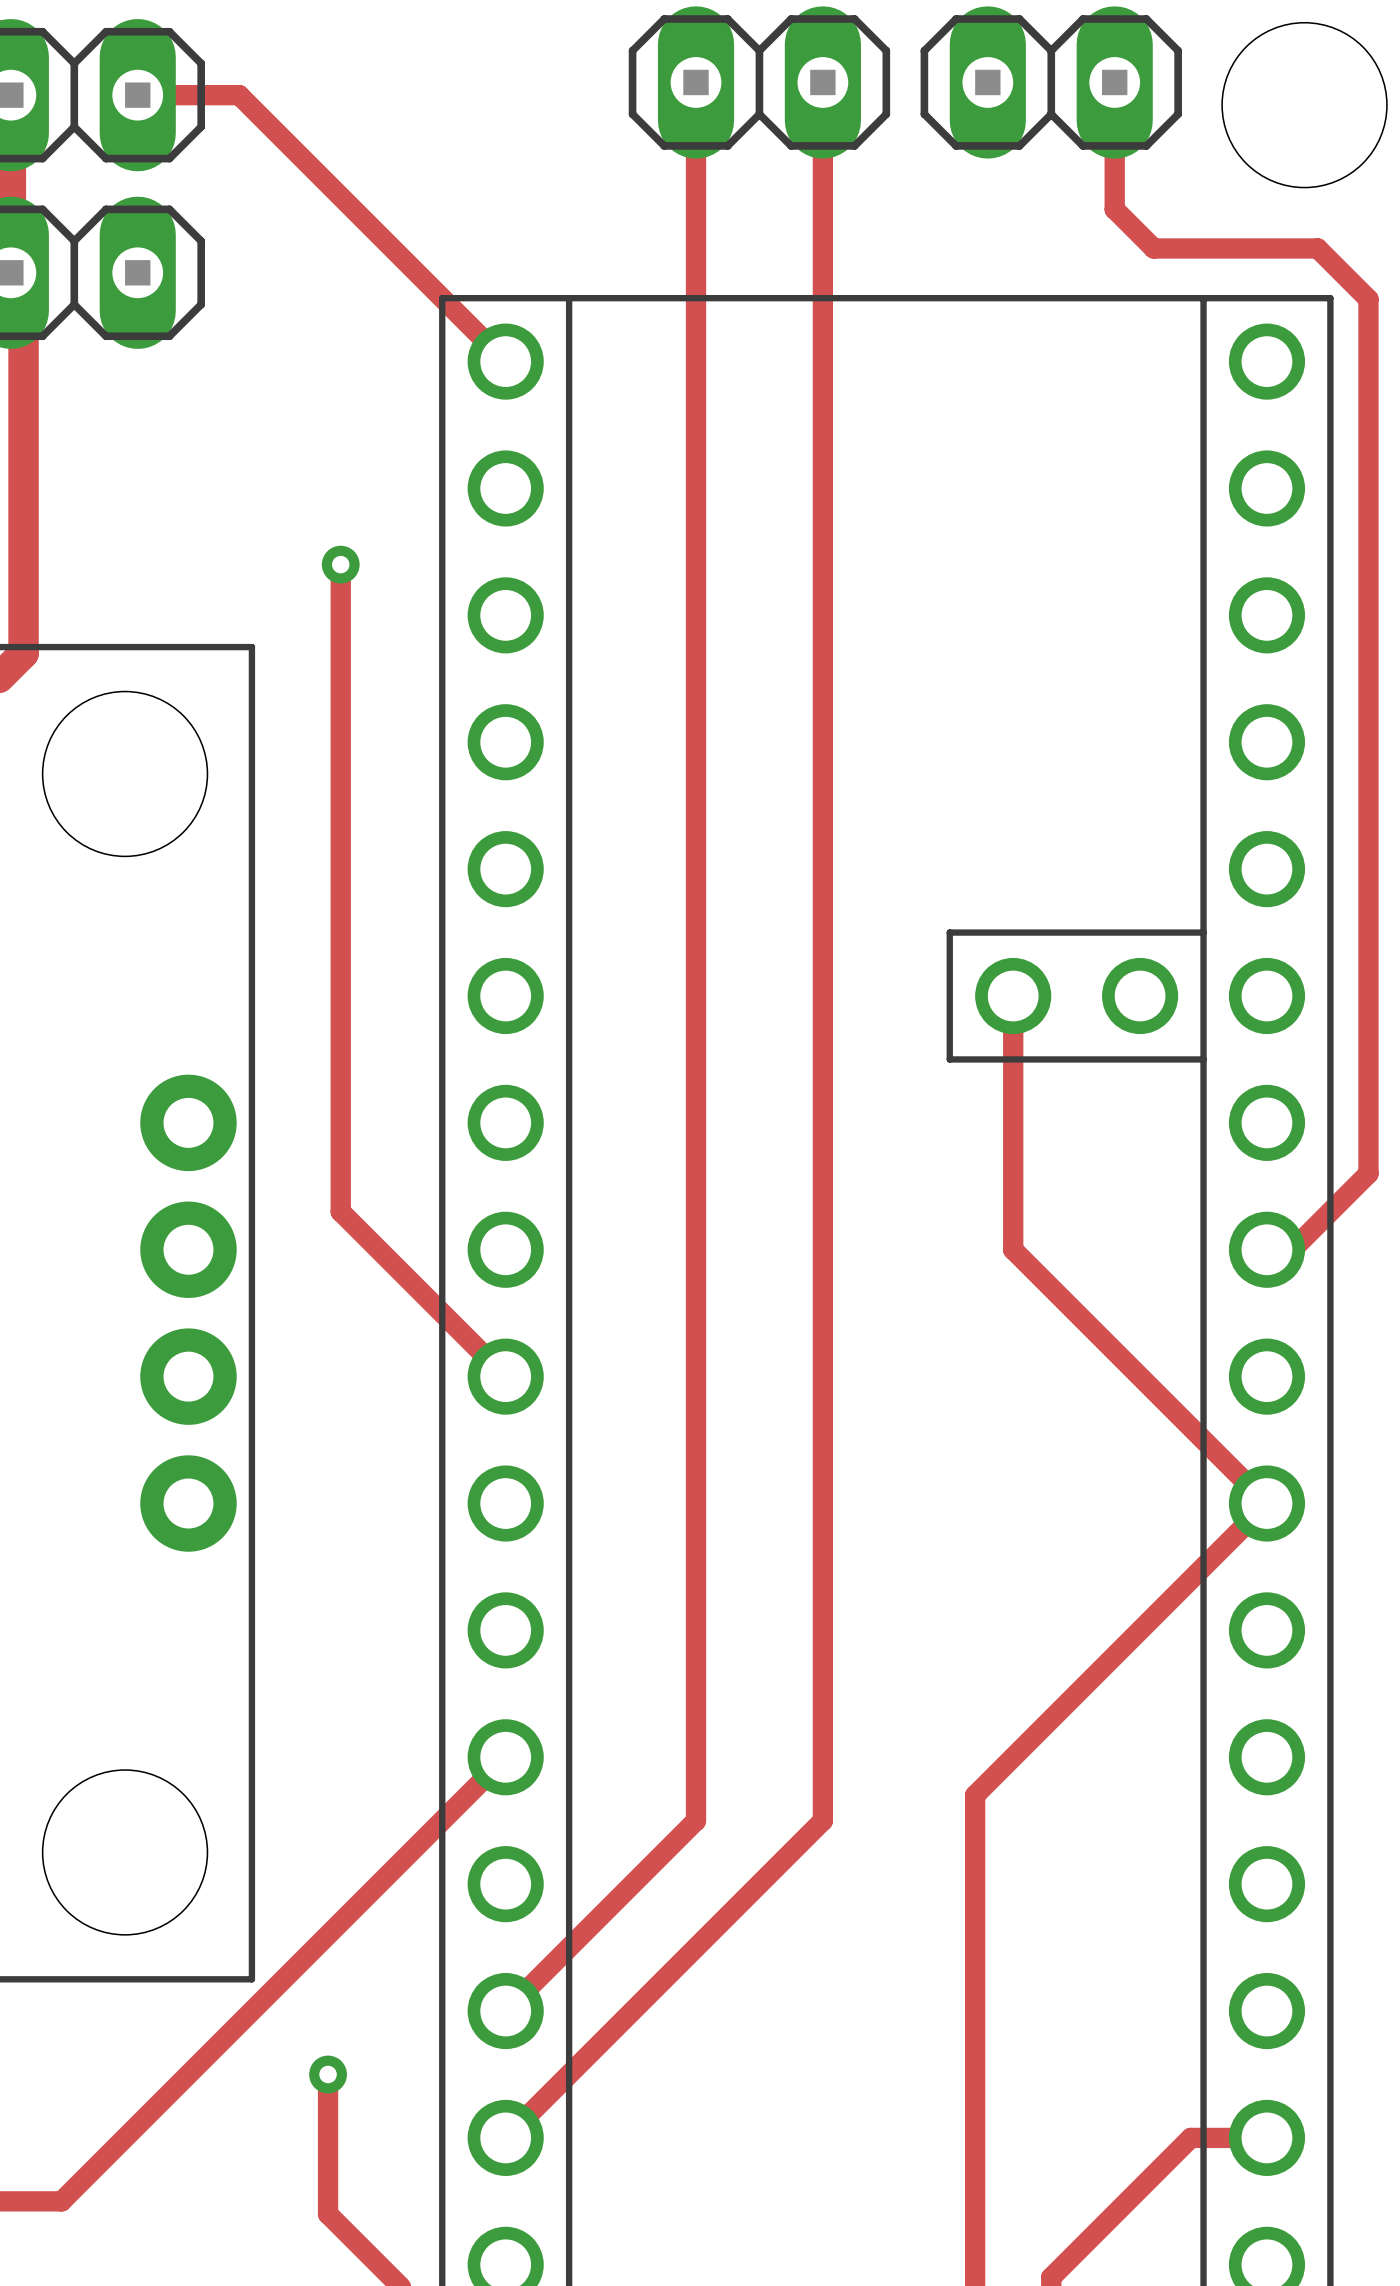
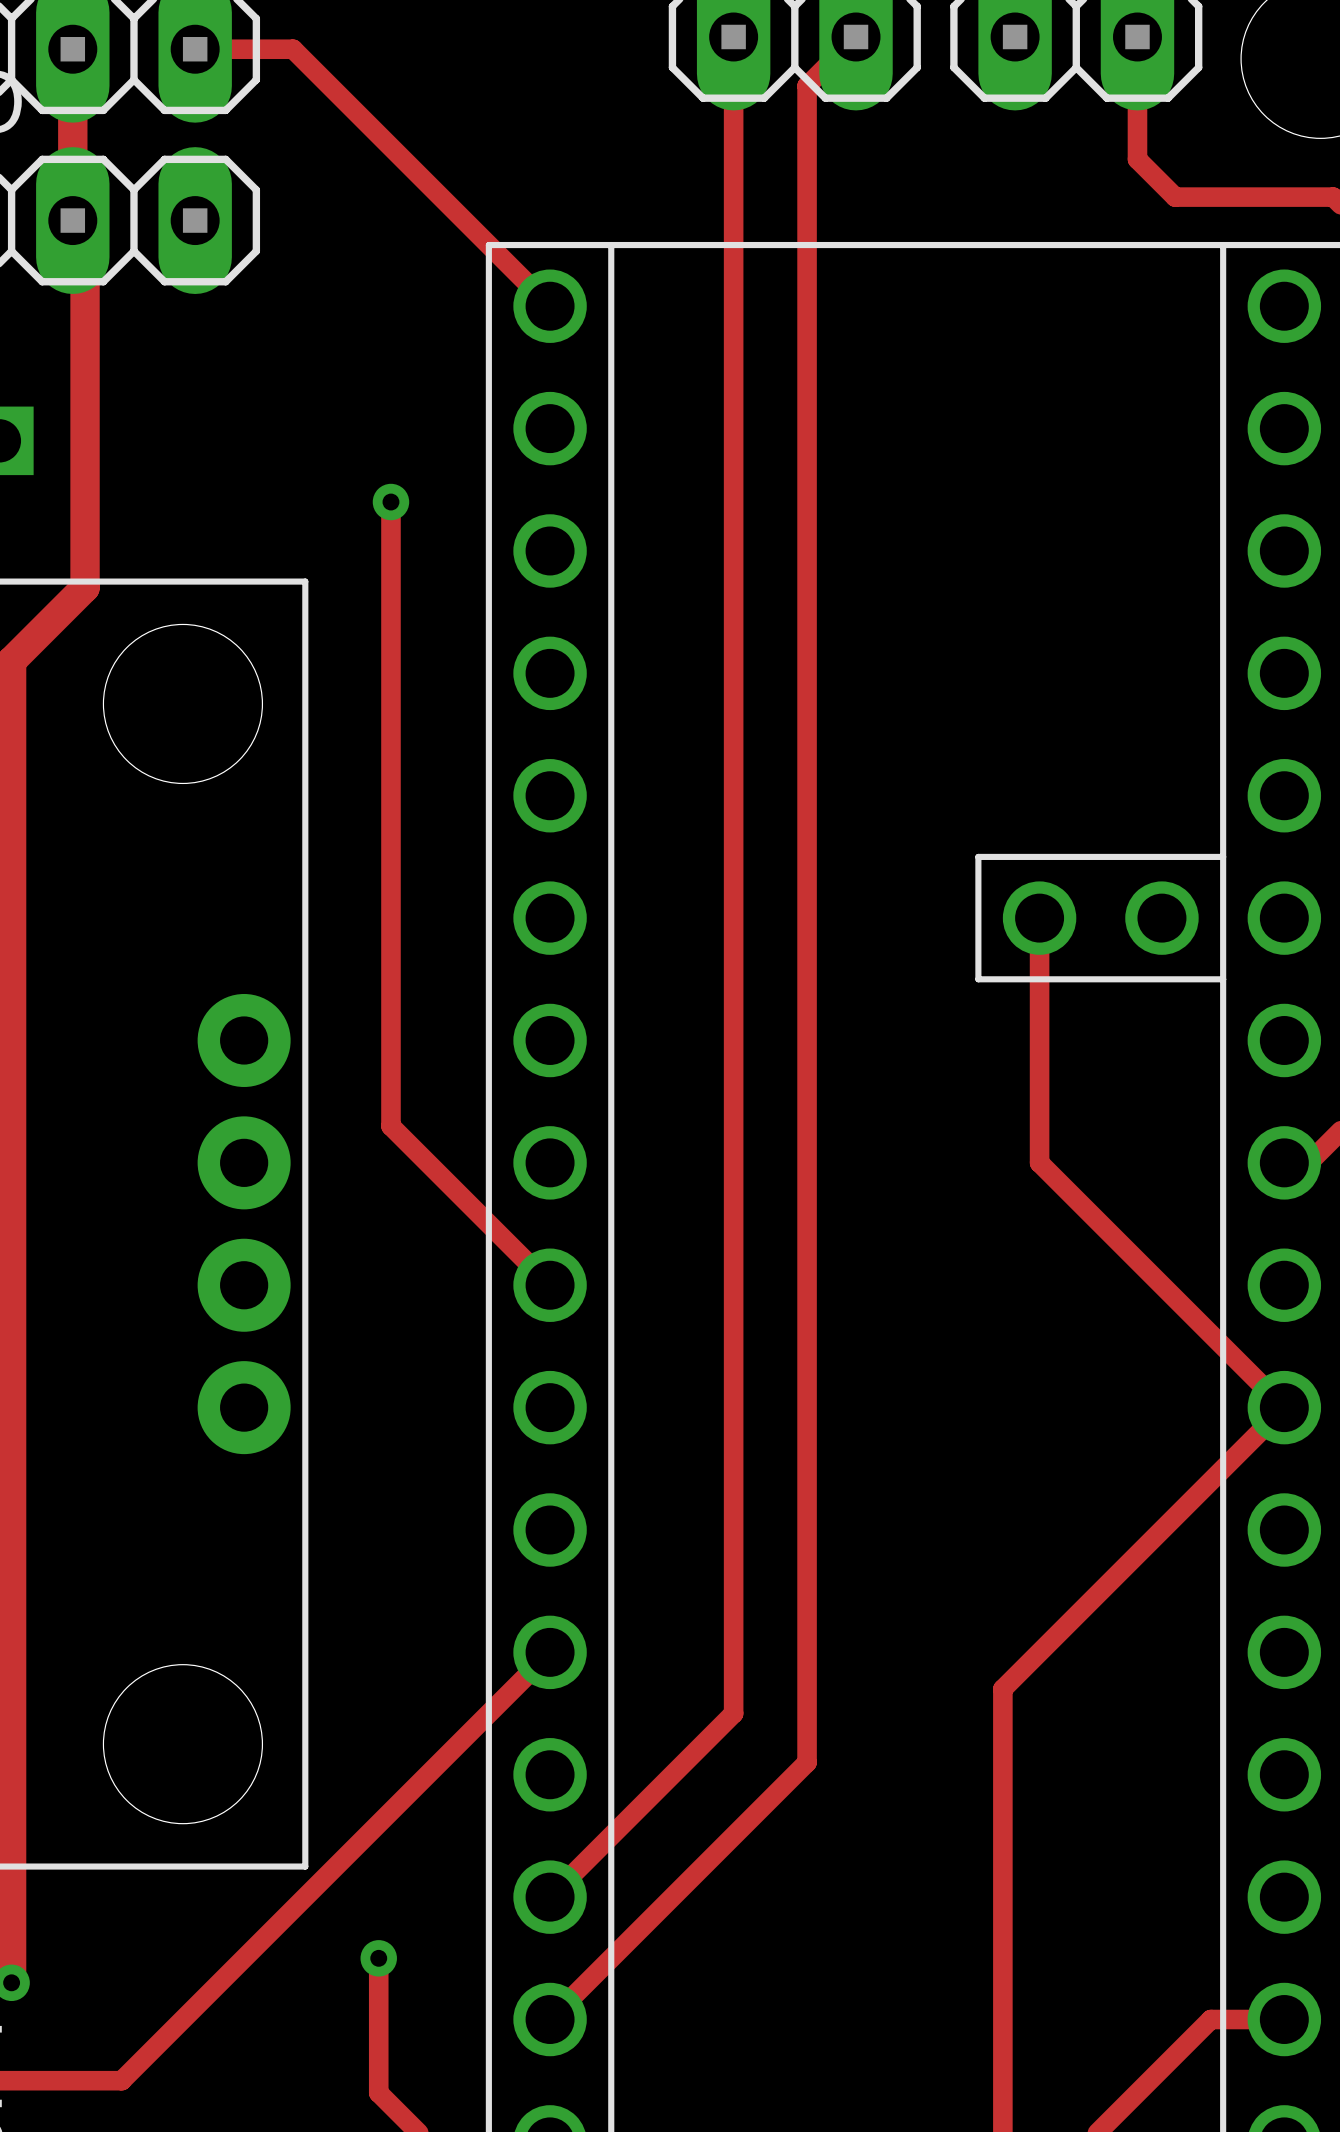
track: (822, 82) (822, 1820) (772, 1871) -> (856, 36) (807, 85) (807, 1762)

